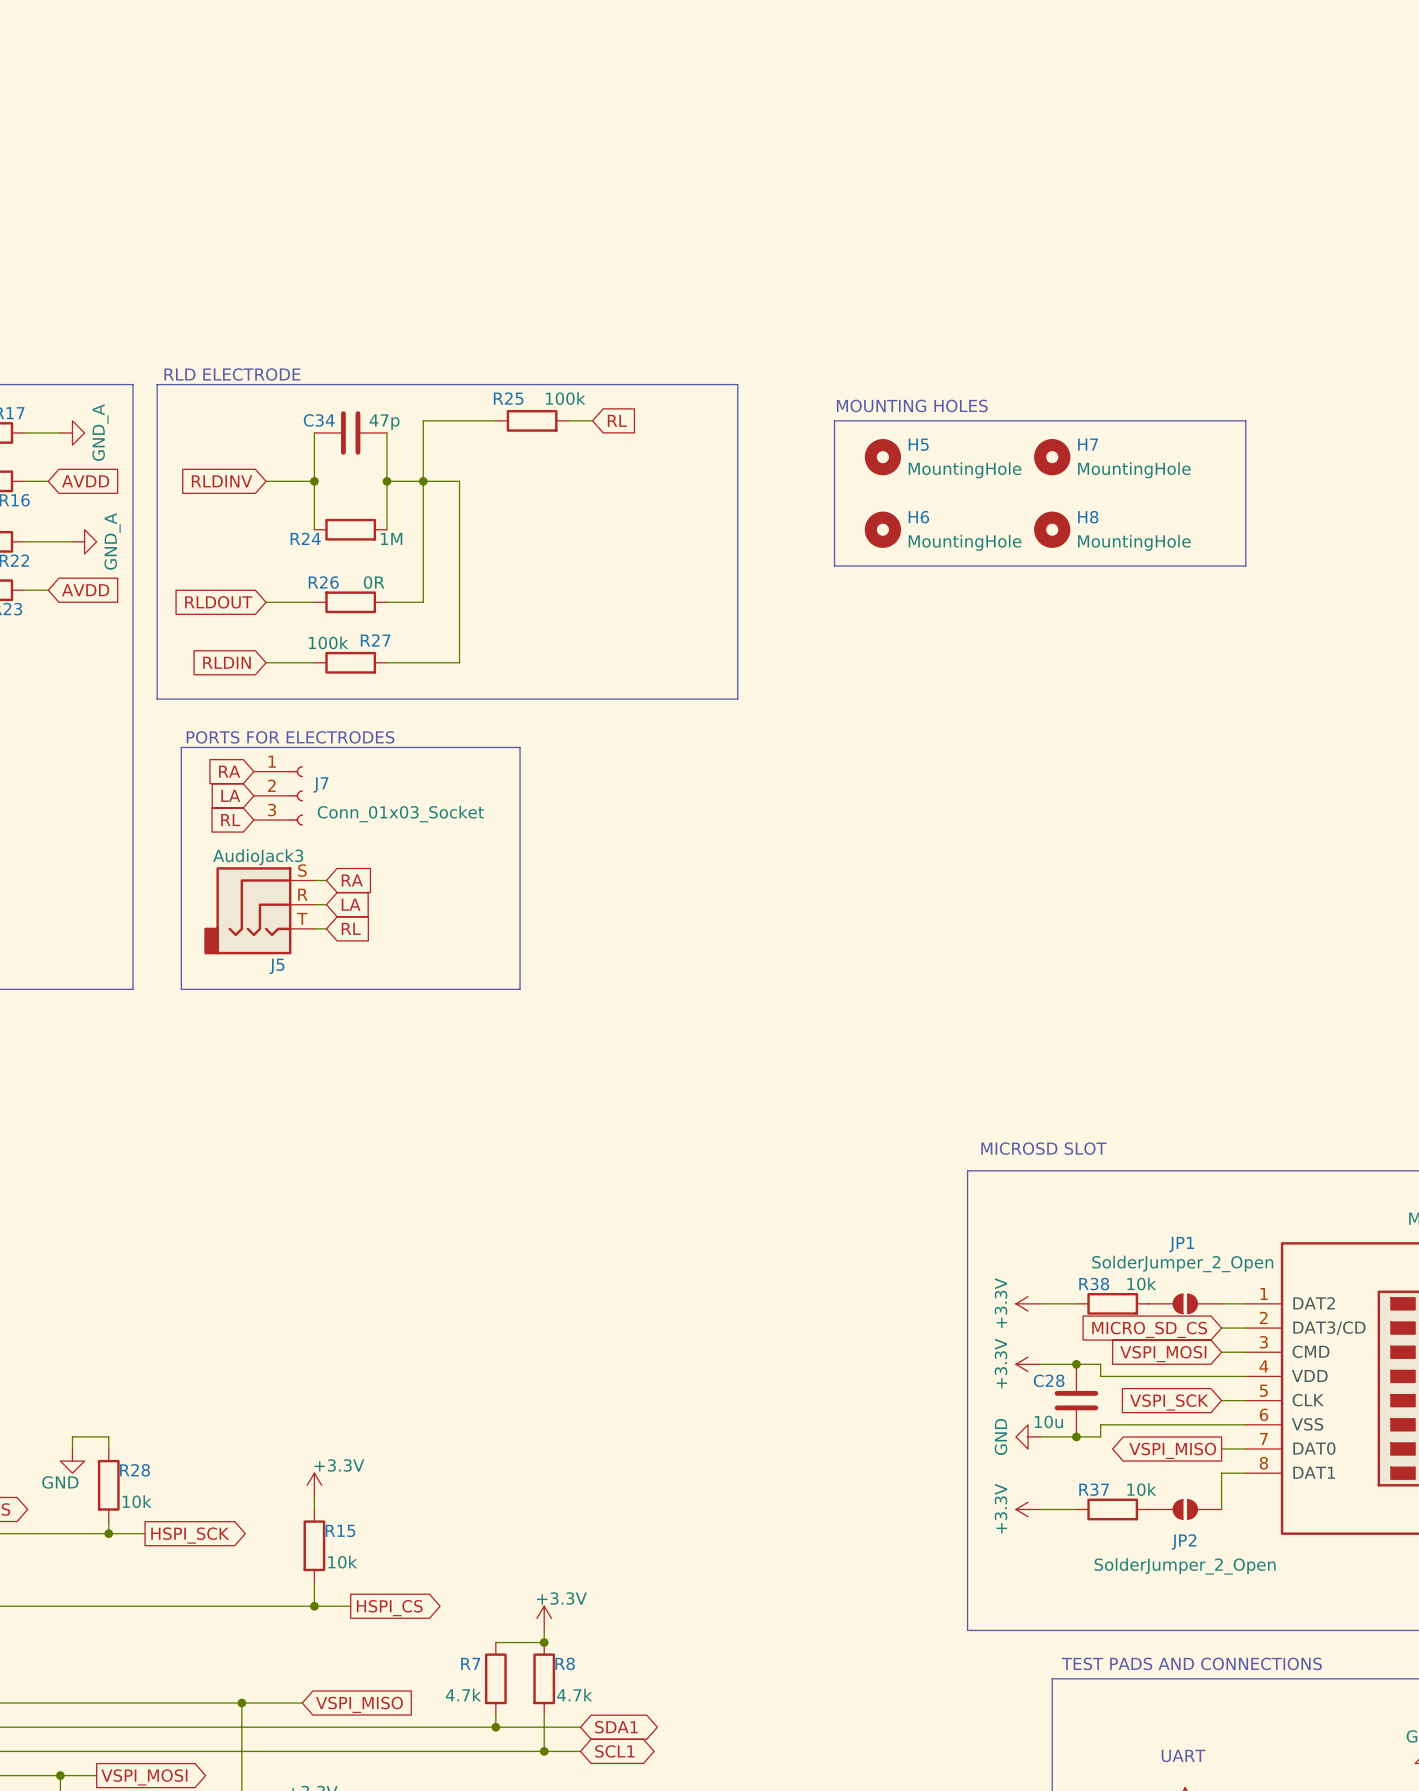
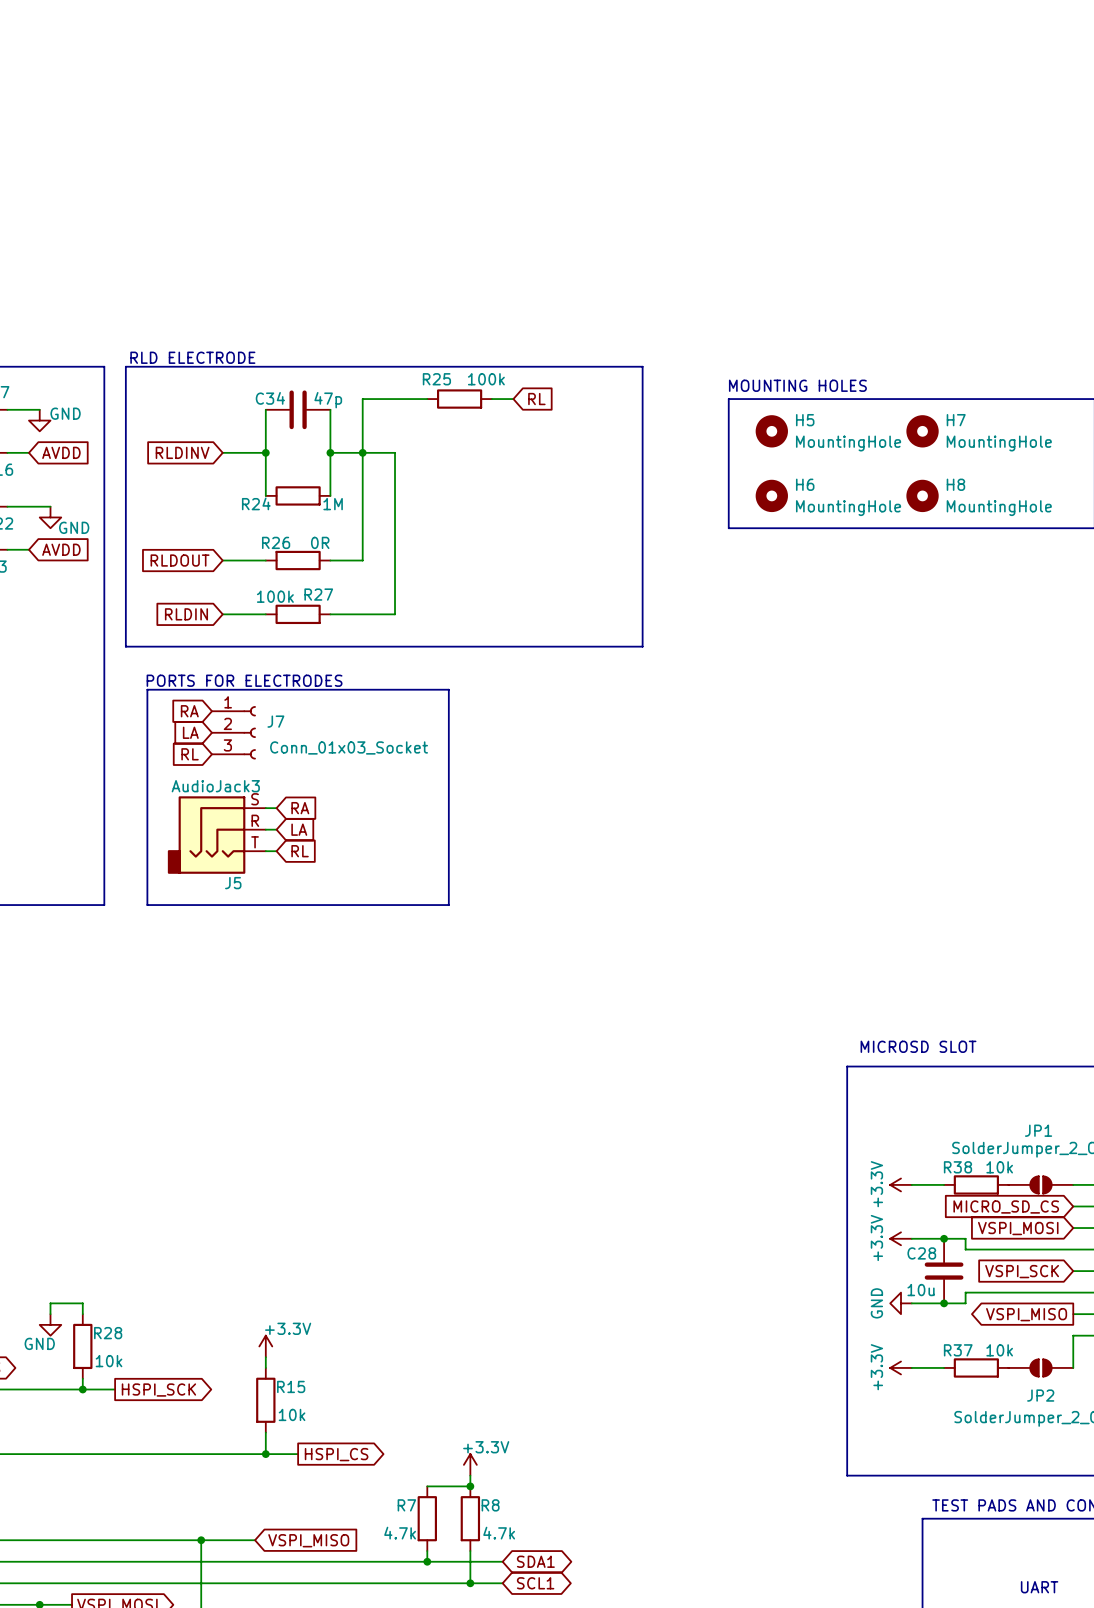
power symbol: GND_A (72, 432) -> none
power symbol: none -> GND (39, 420)
power symbol: GND_A (84, 541) -> none
power symbol: none -> GND (50, 517)

